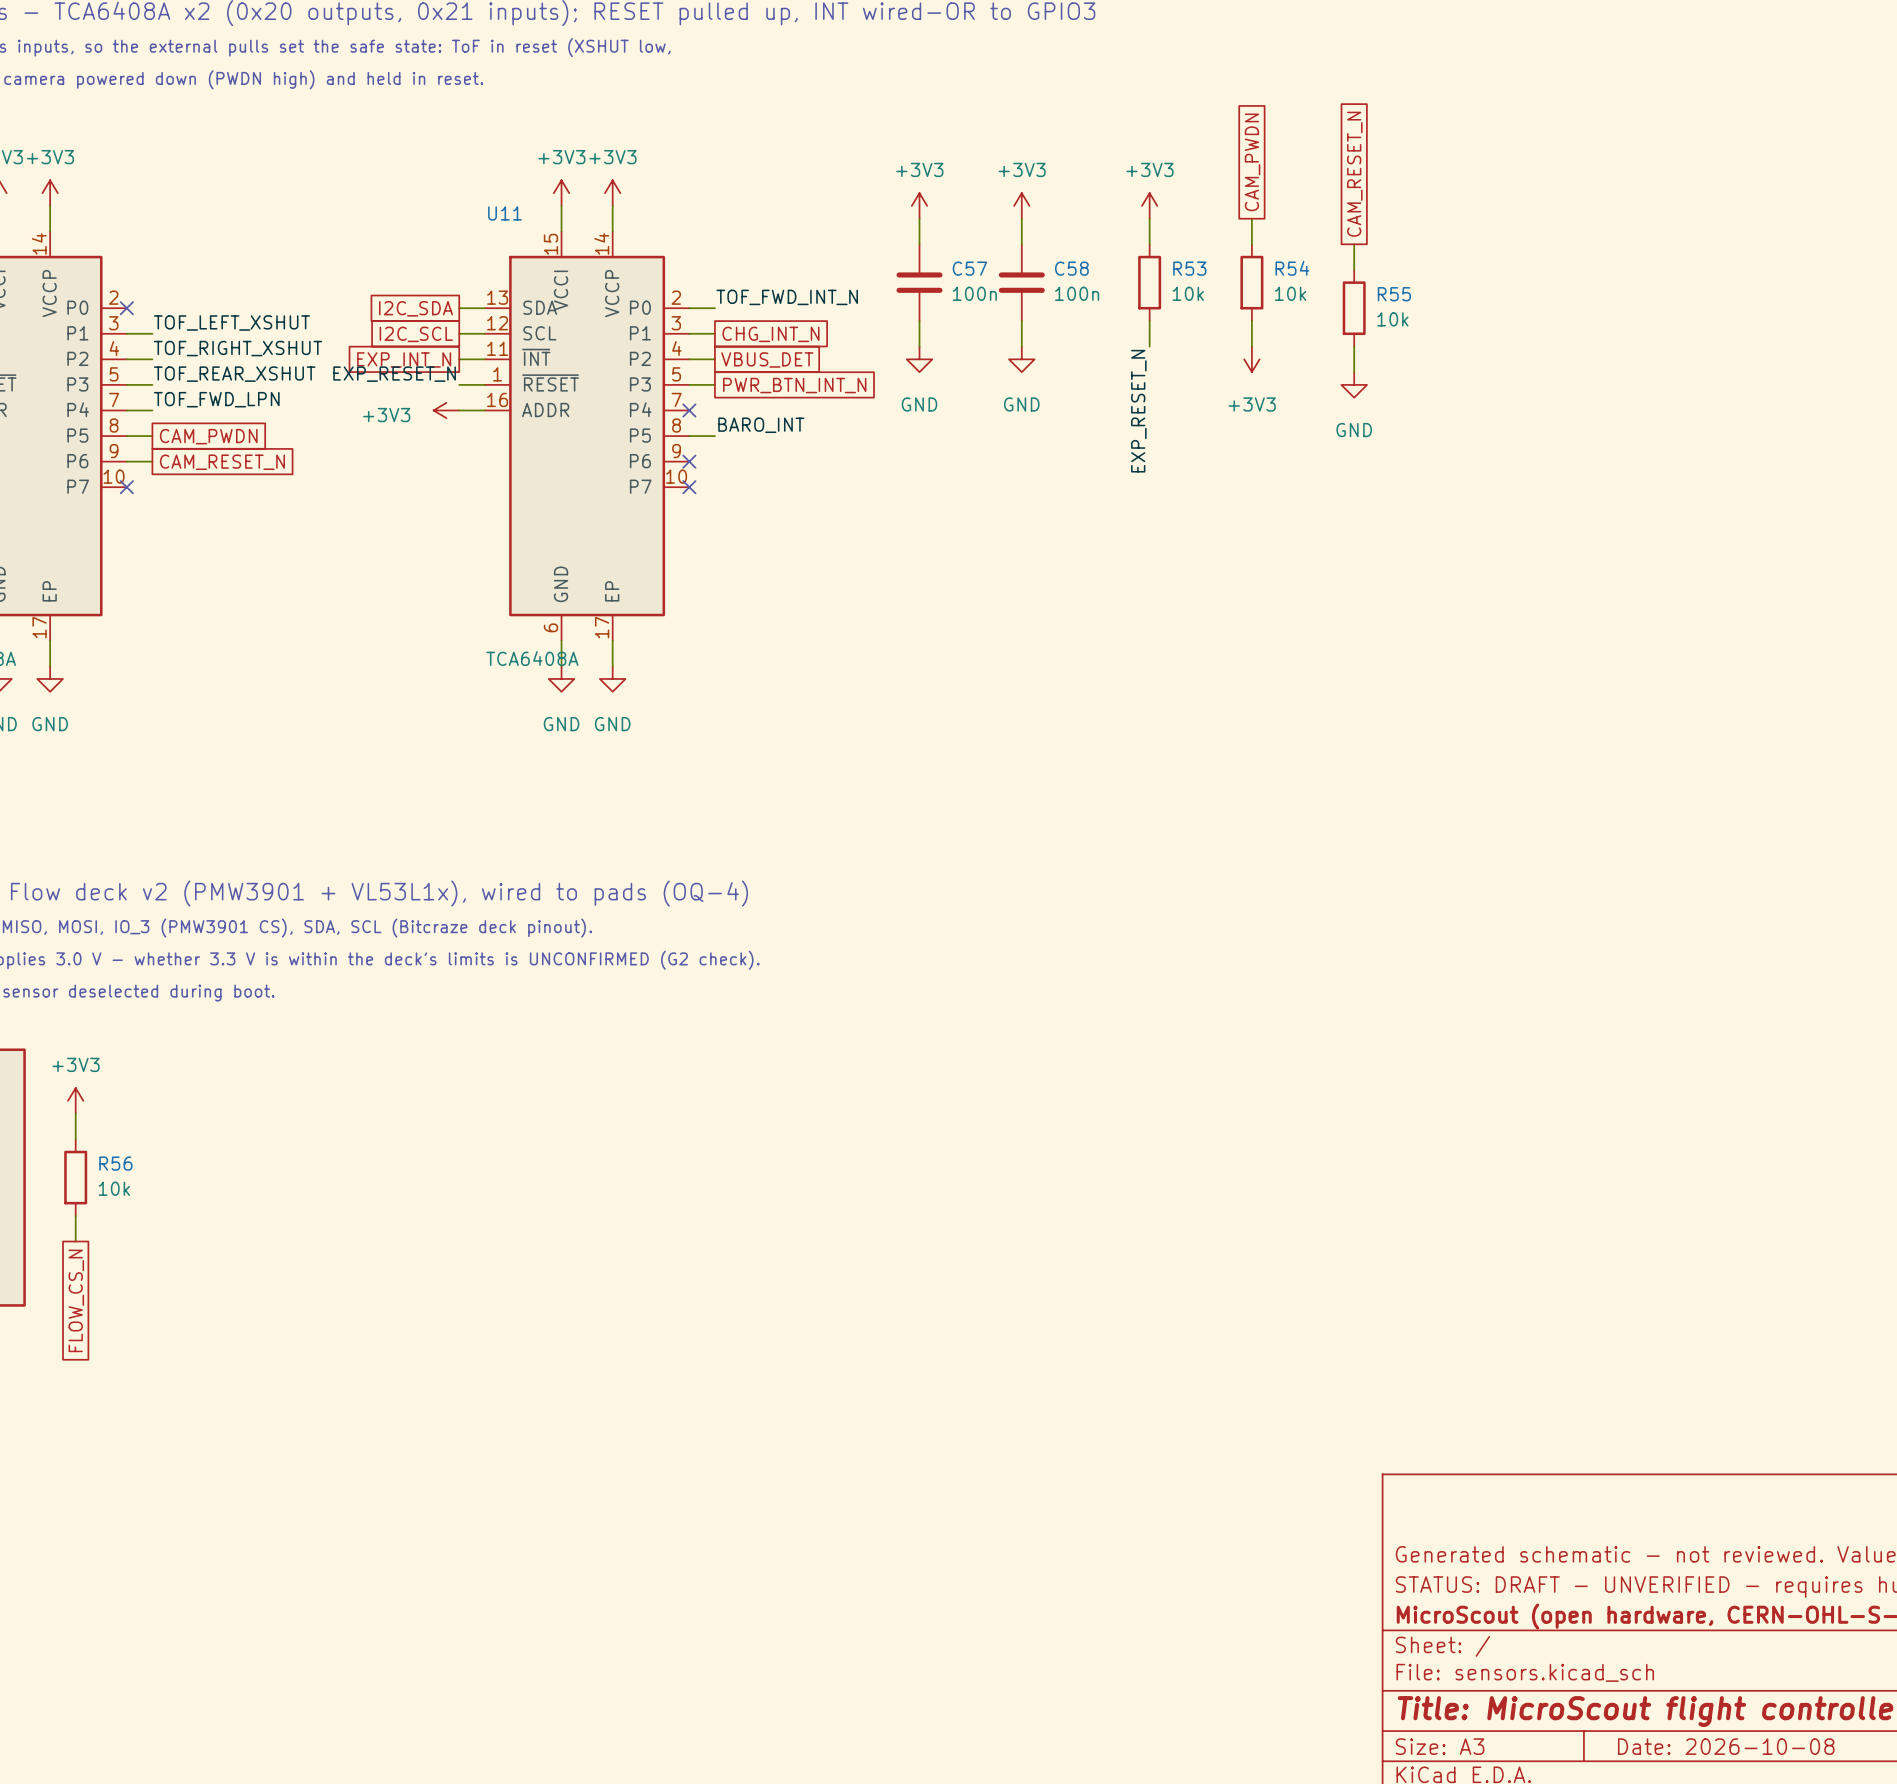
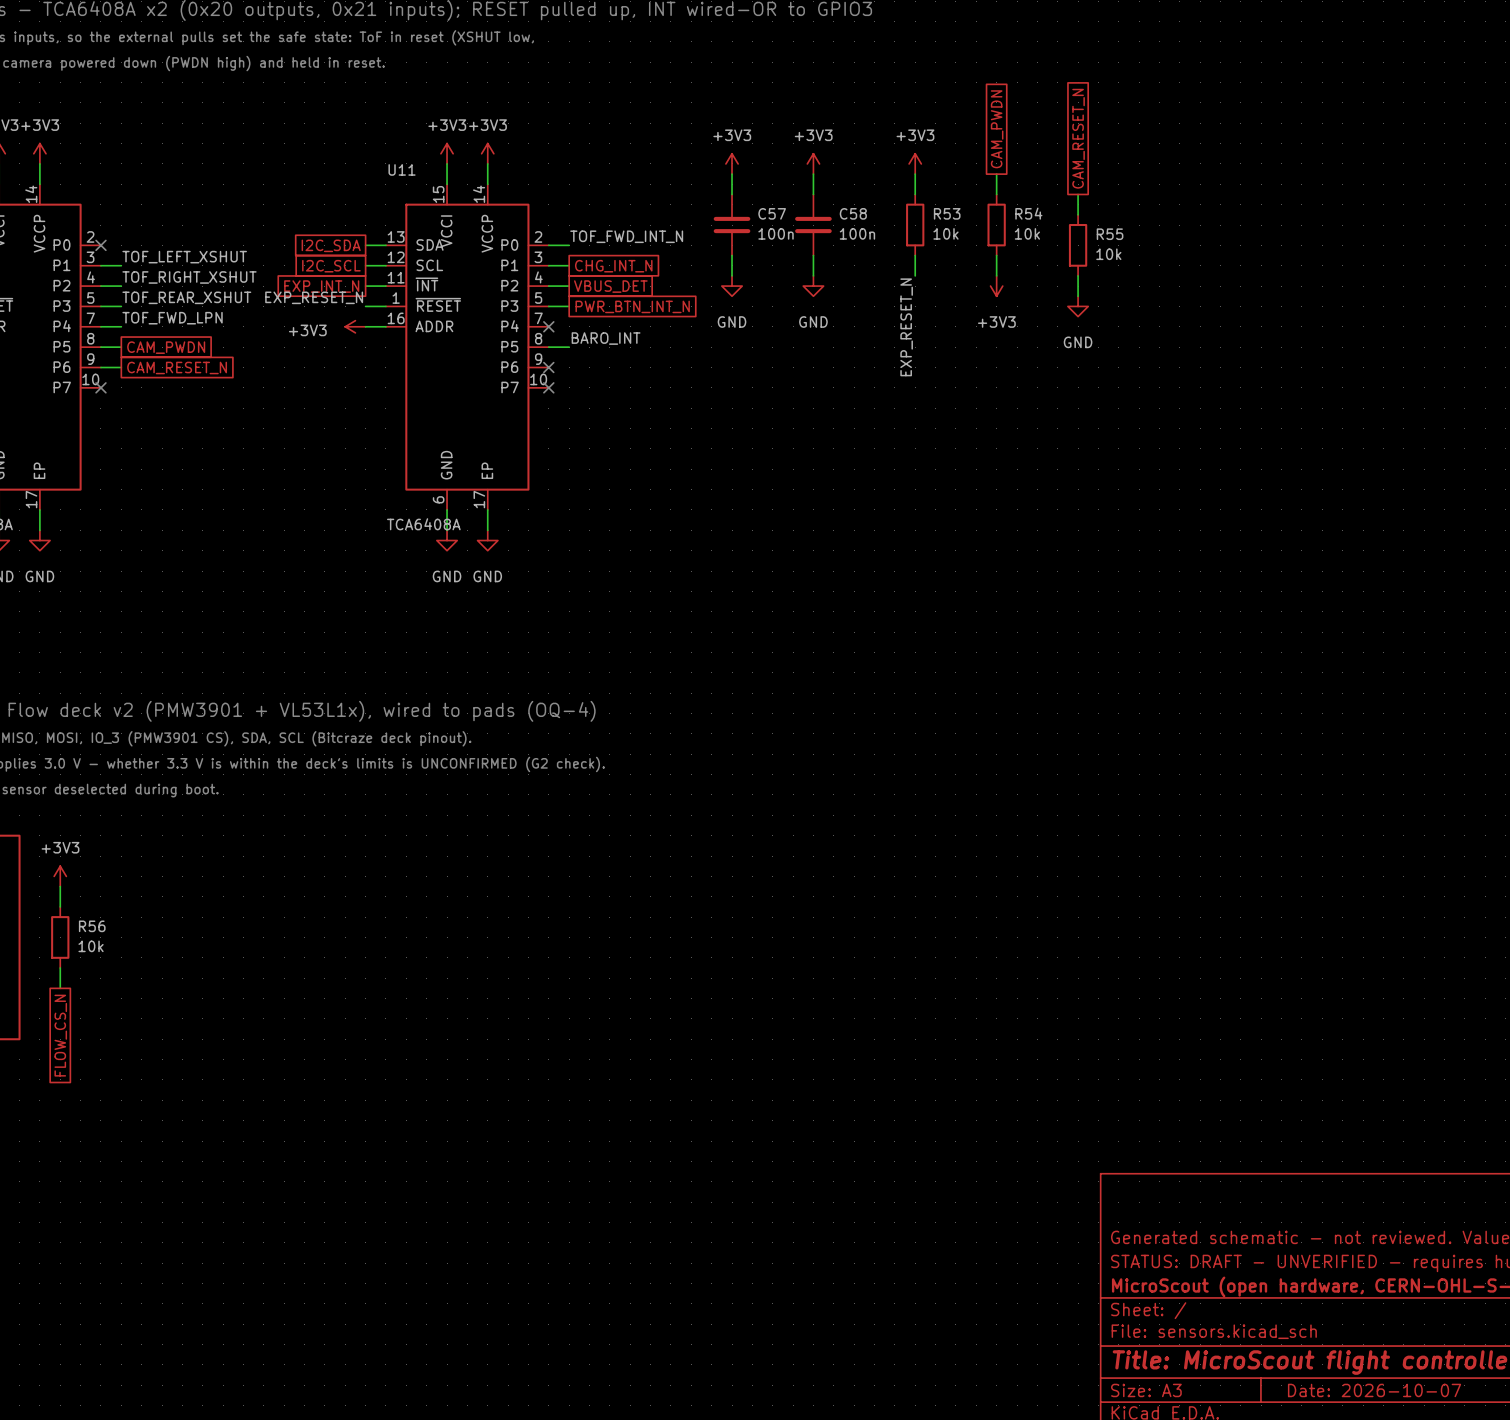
title block: Date: 2026-10-08 (1726, 1746) -> Date: 2026-10-07 (1374, 1390)

